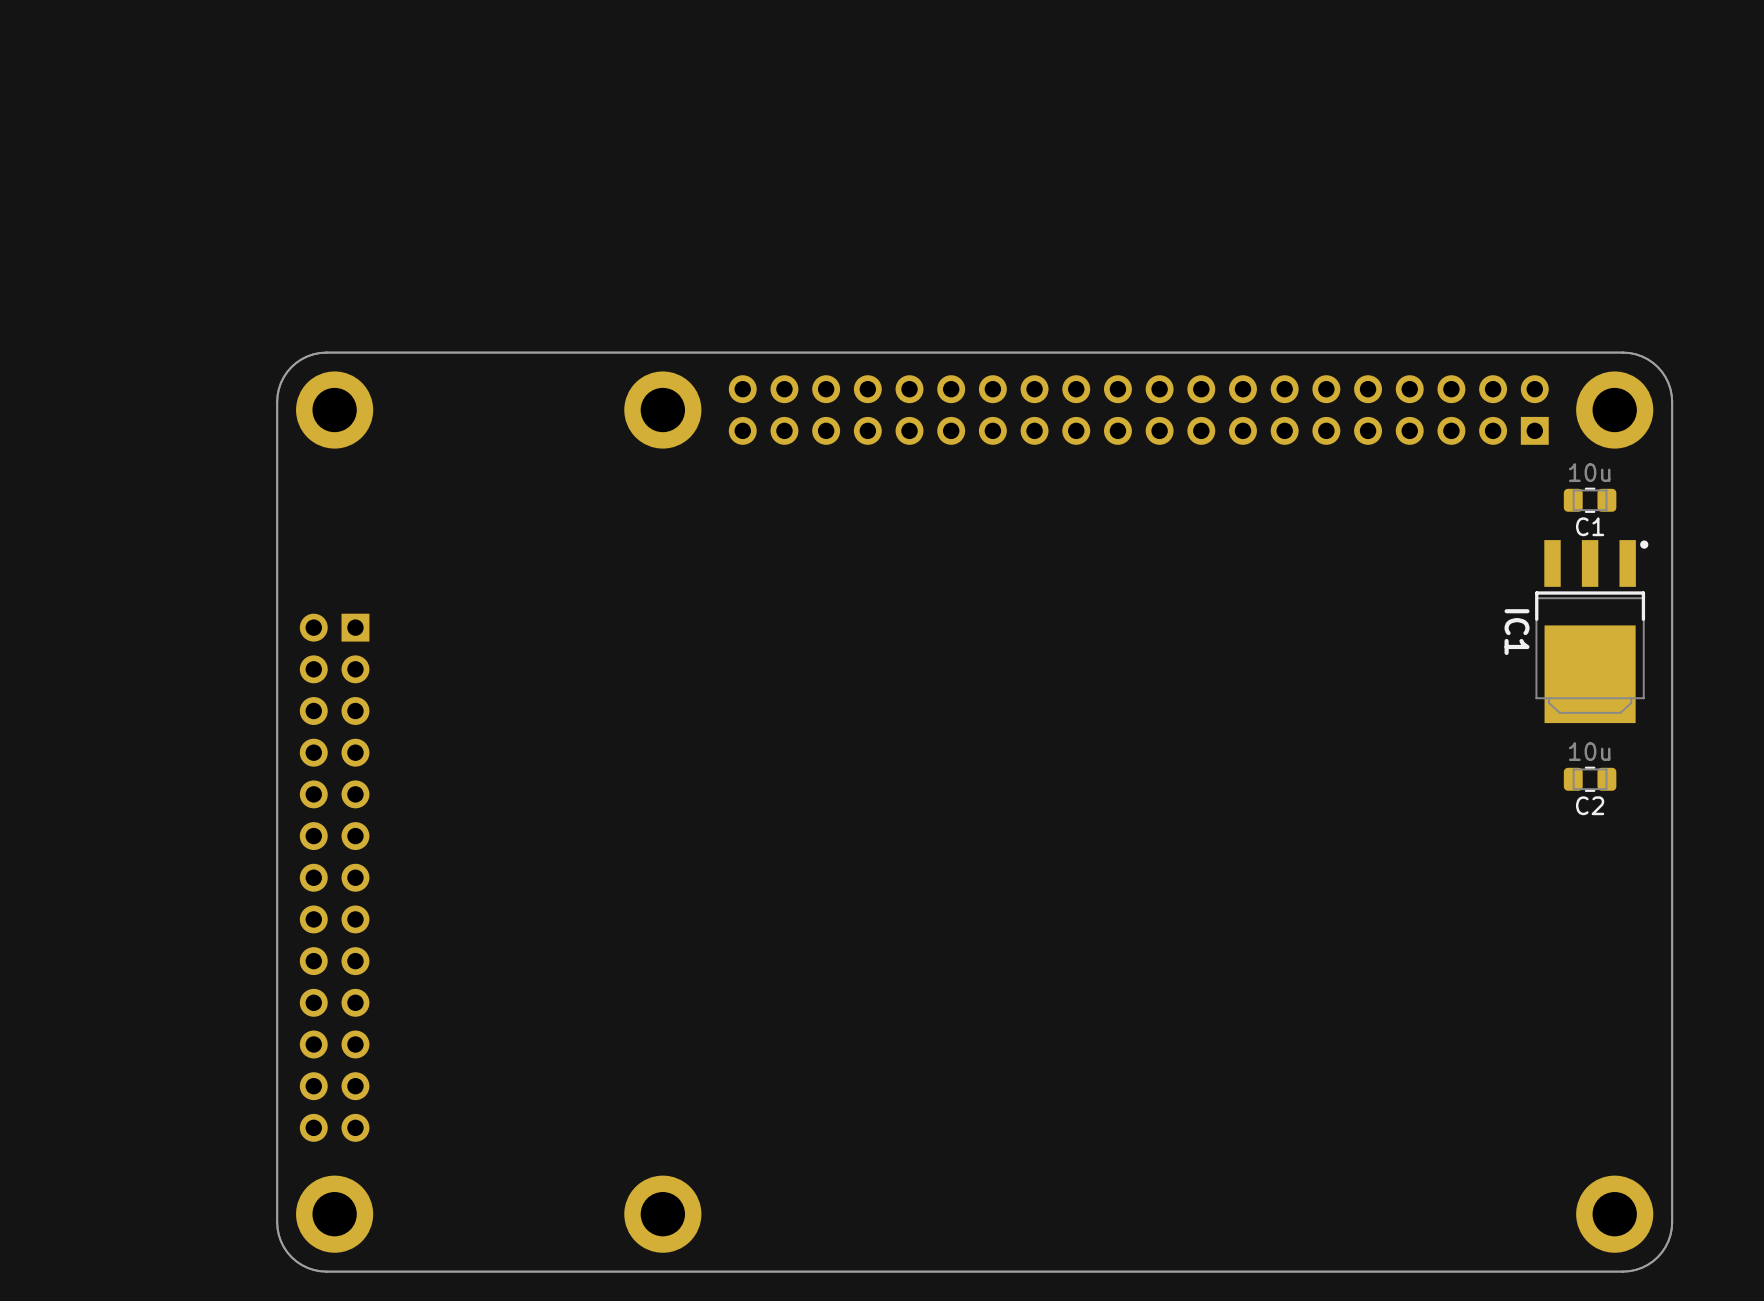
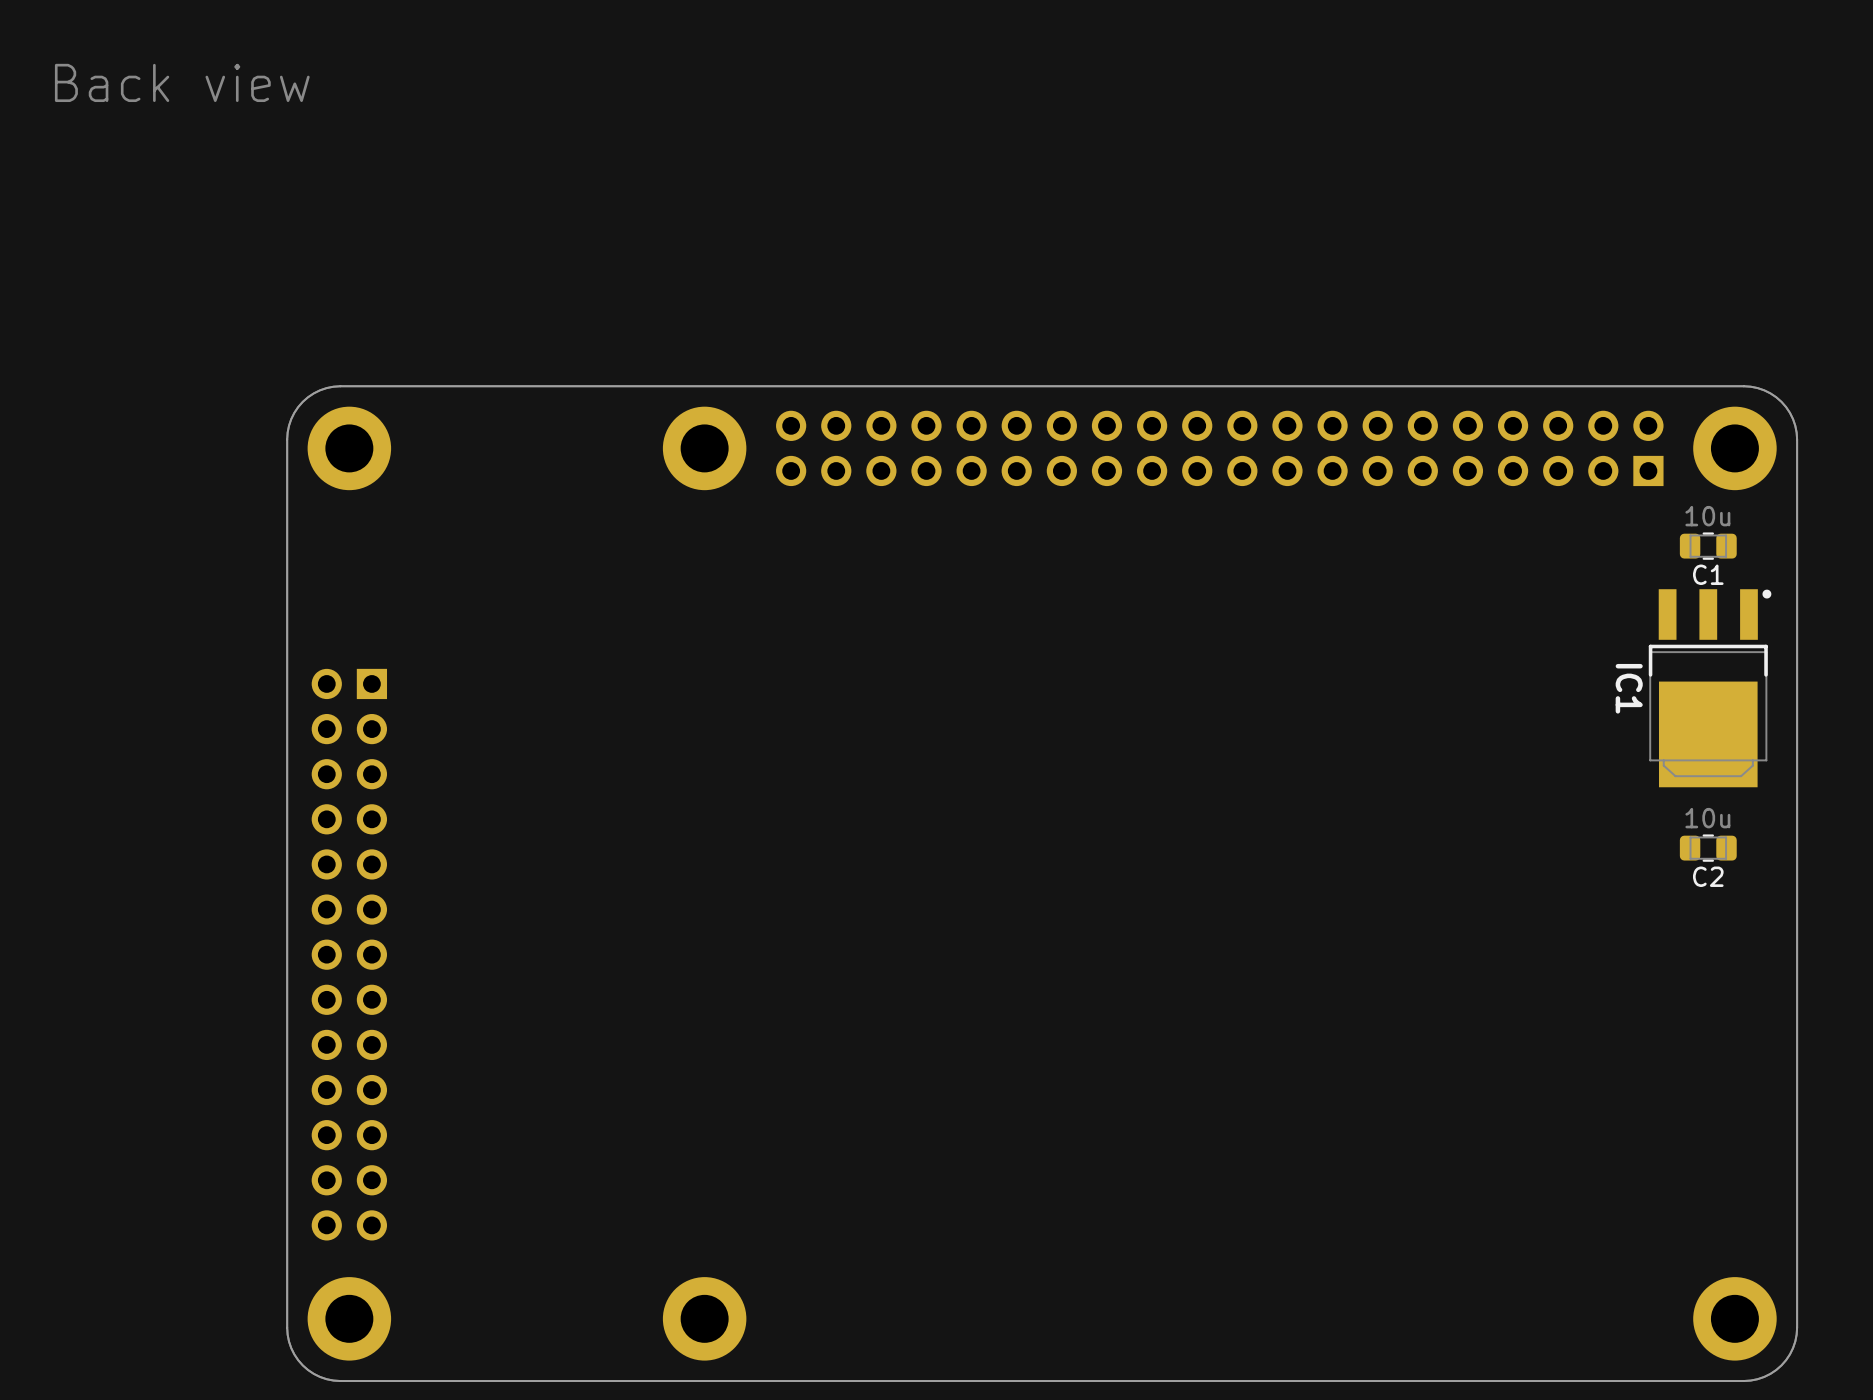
text: none -> Back view (182, 82)

